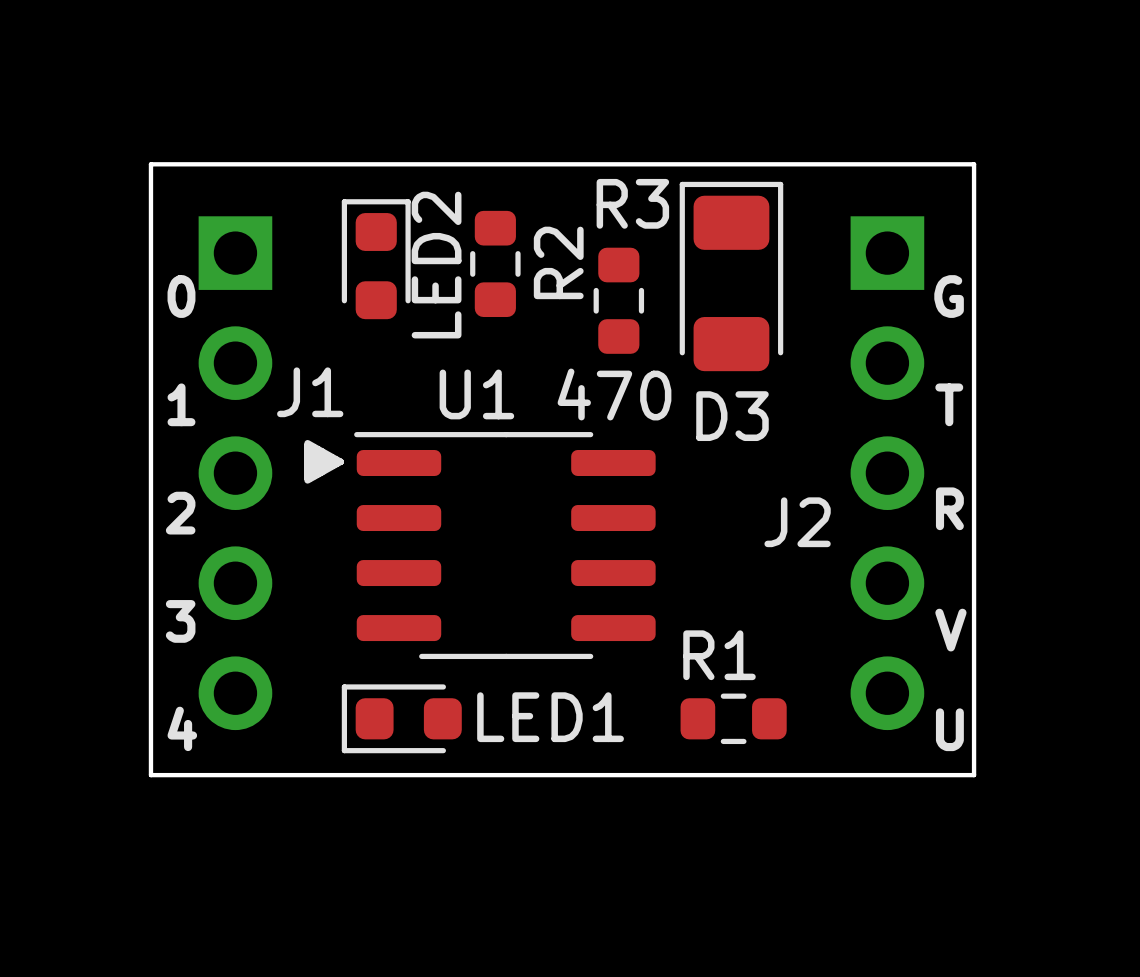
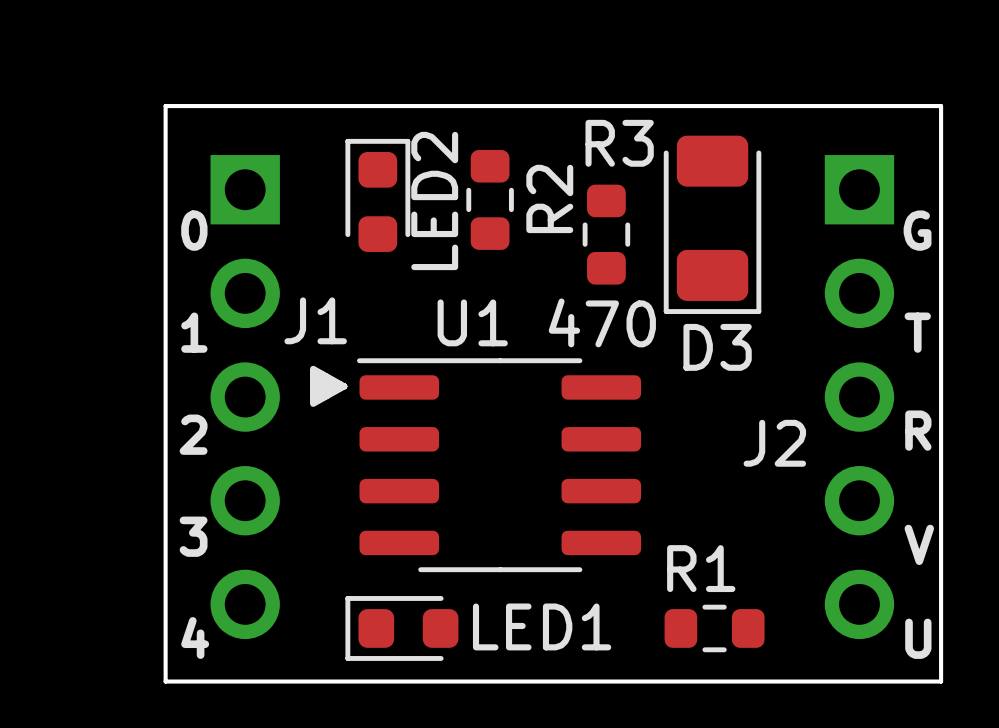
D3 rotation: 0° (731, 276) -> 180° (712, 224)

